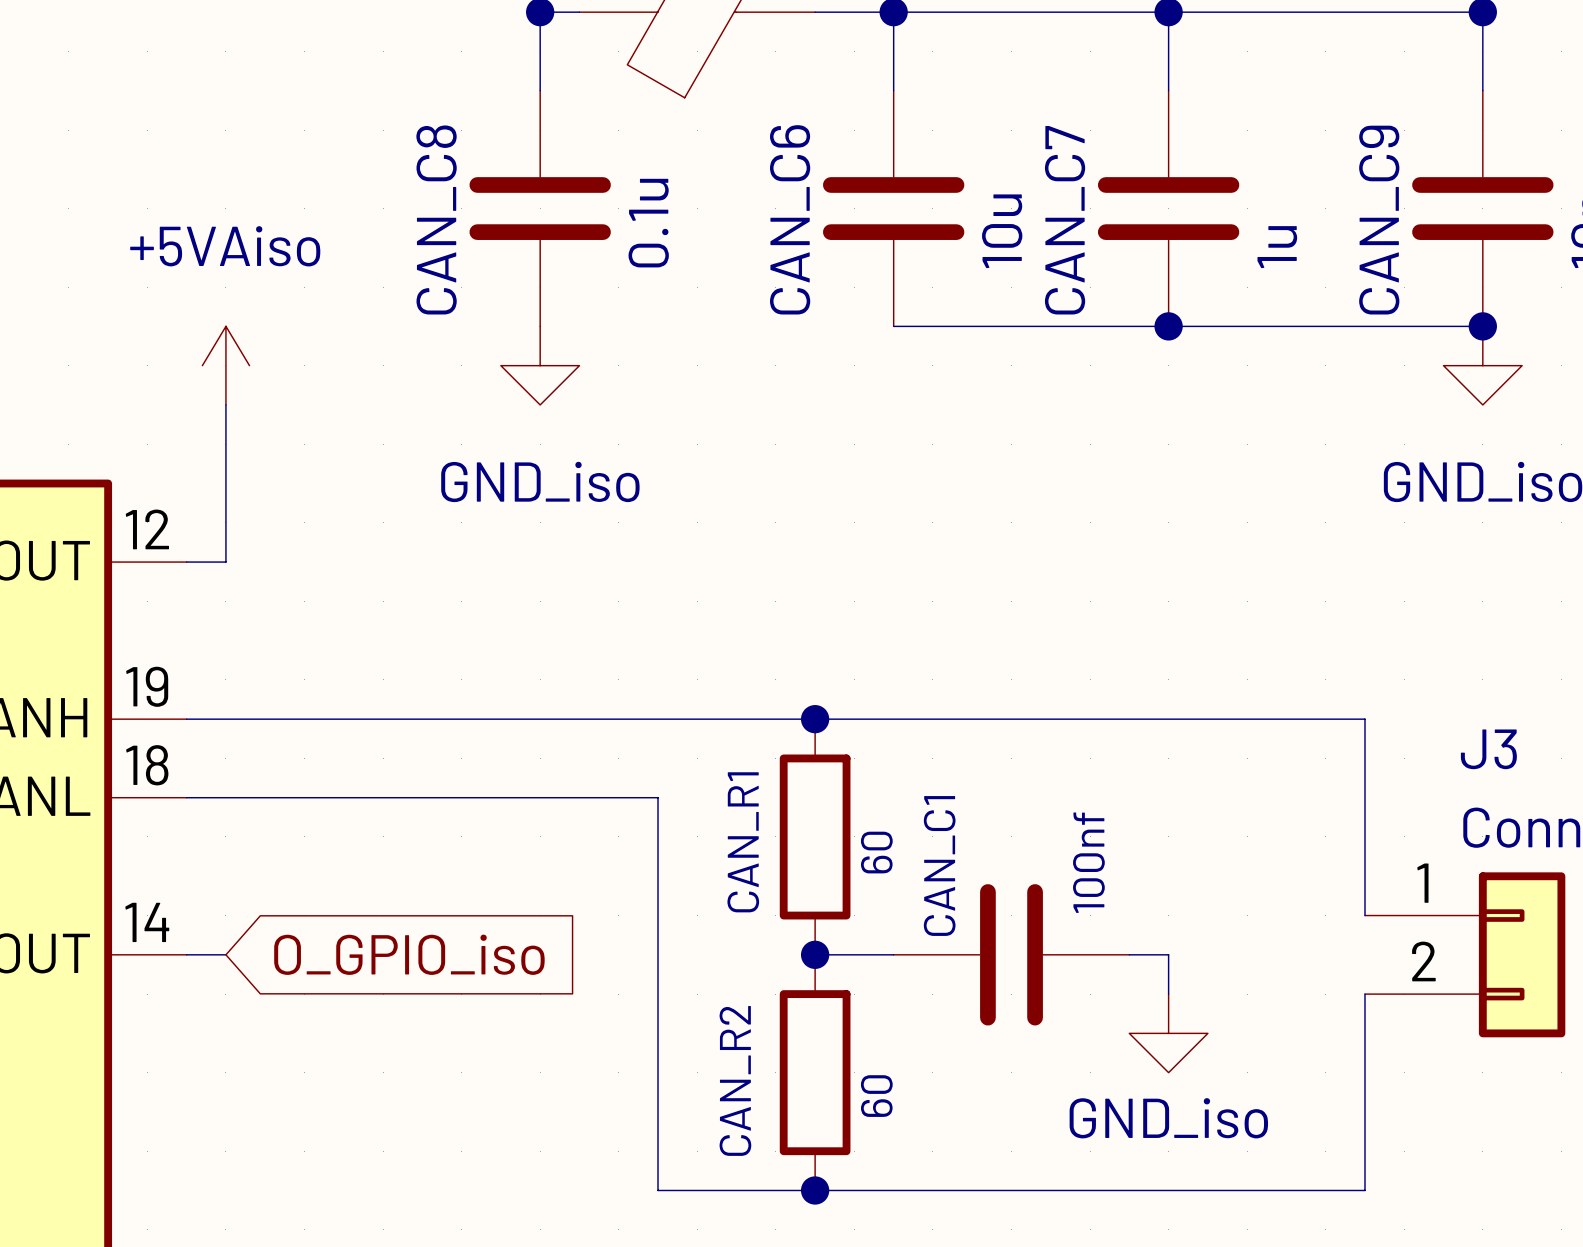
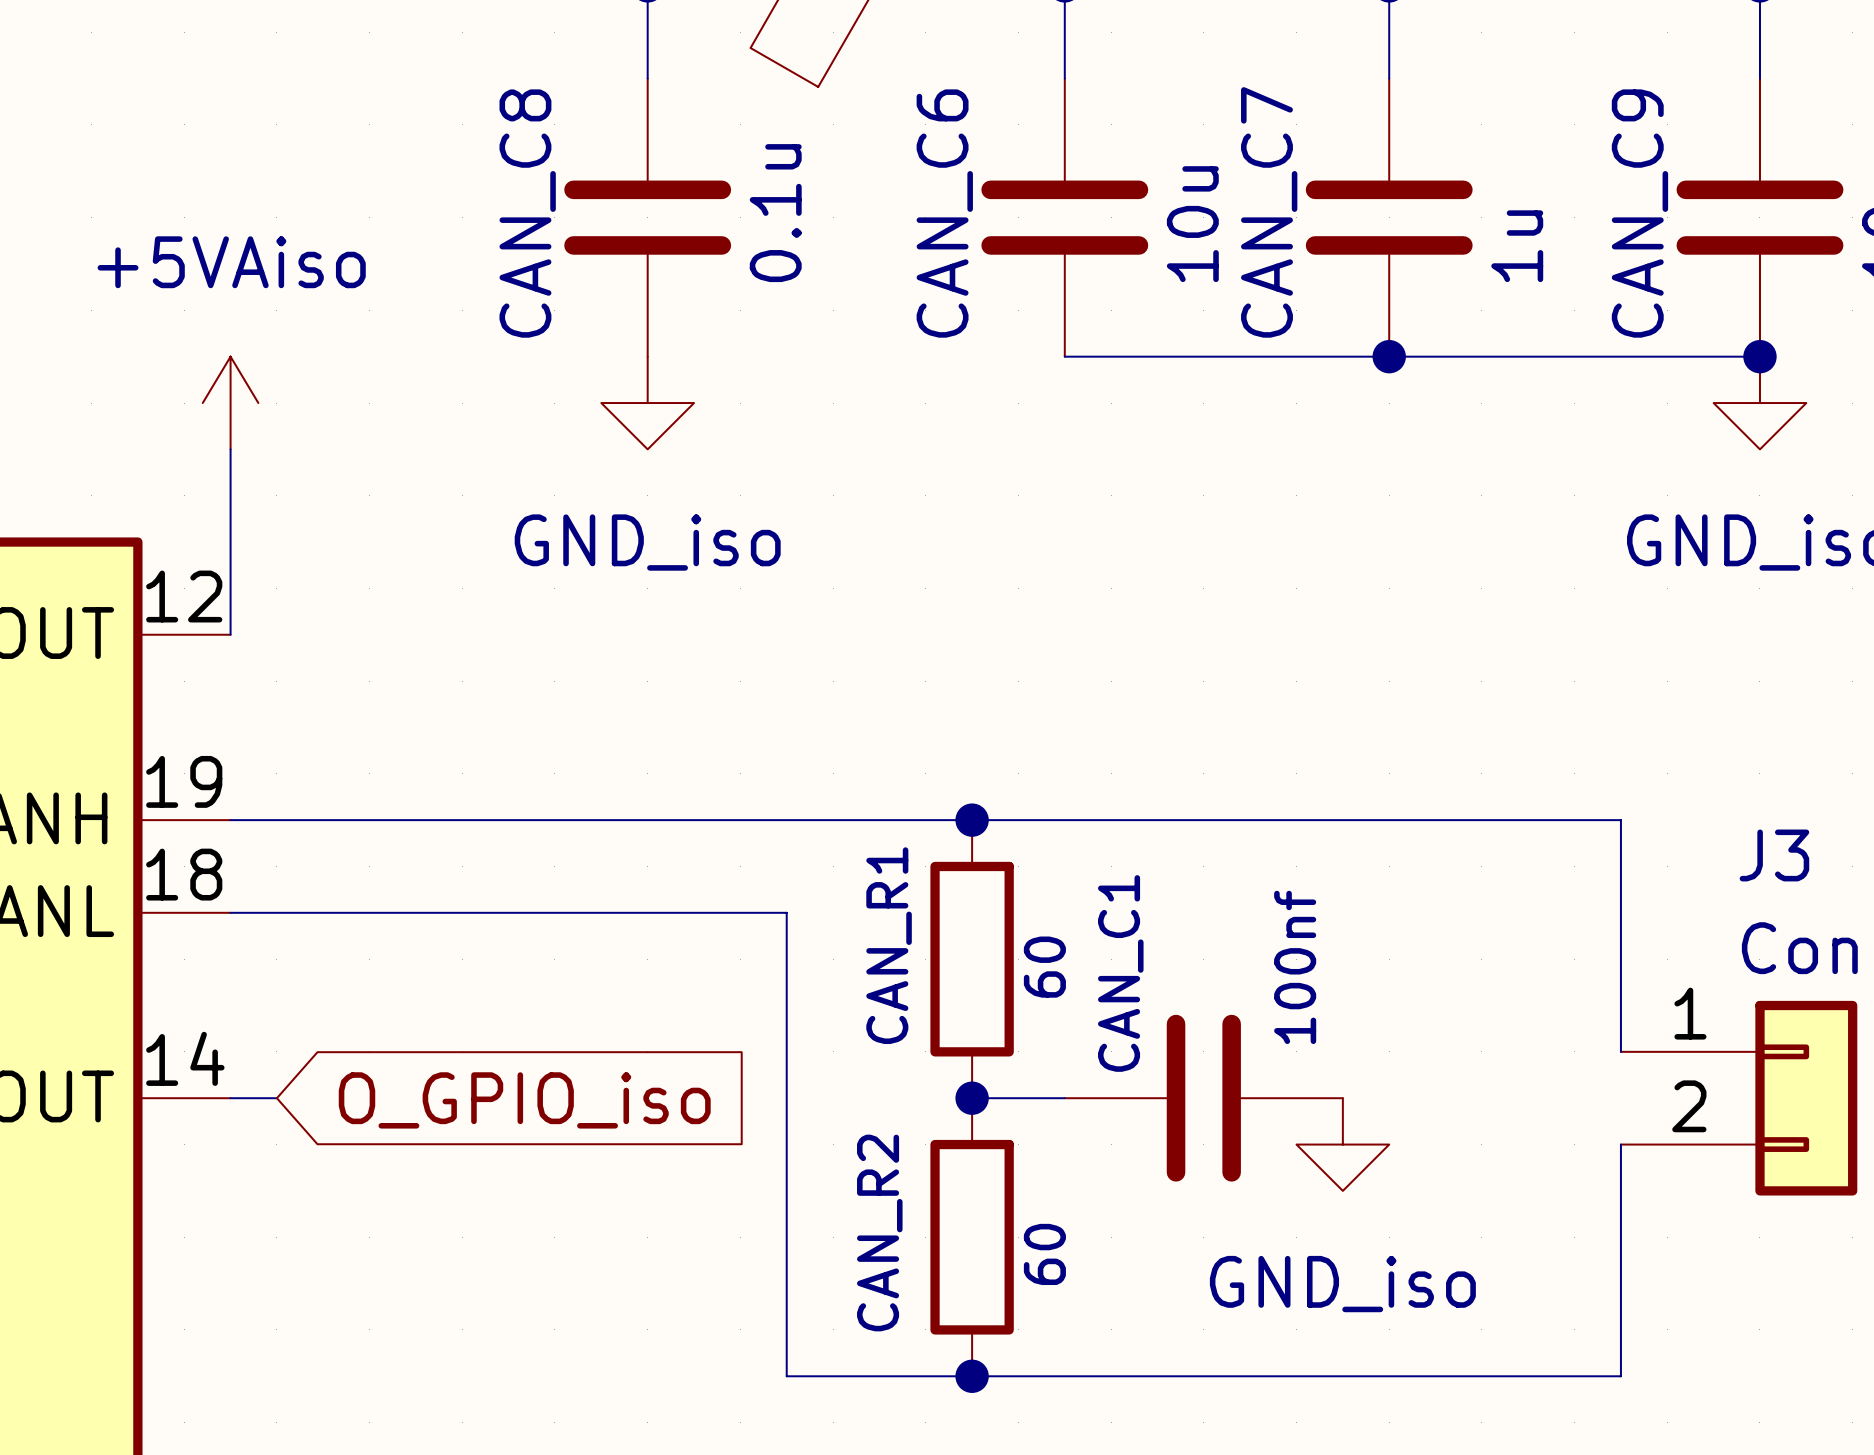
power symbol position: +5VAiso (225, 365) -> +5VAiso (230, 403)
wire: (225, 404) (225, 562) (186, 562) -> (230, 449) (230, 634)
wire: (1129, 954) (1168, 954) (1168, 994) -> none
power symbol position: GND_iso (1168, 1033) -> GND_iso (1342, 1144)
power symbol text position: GND_iso (1168, 1118) -> GND_iso (1342, 1284)

